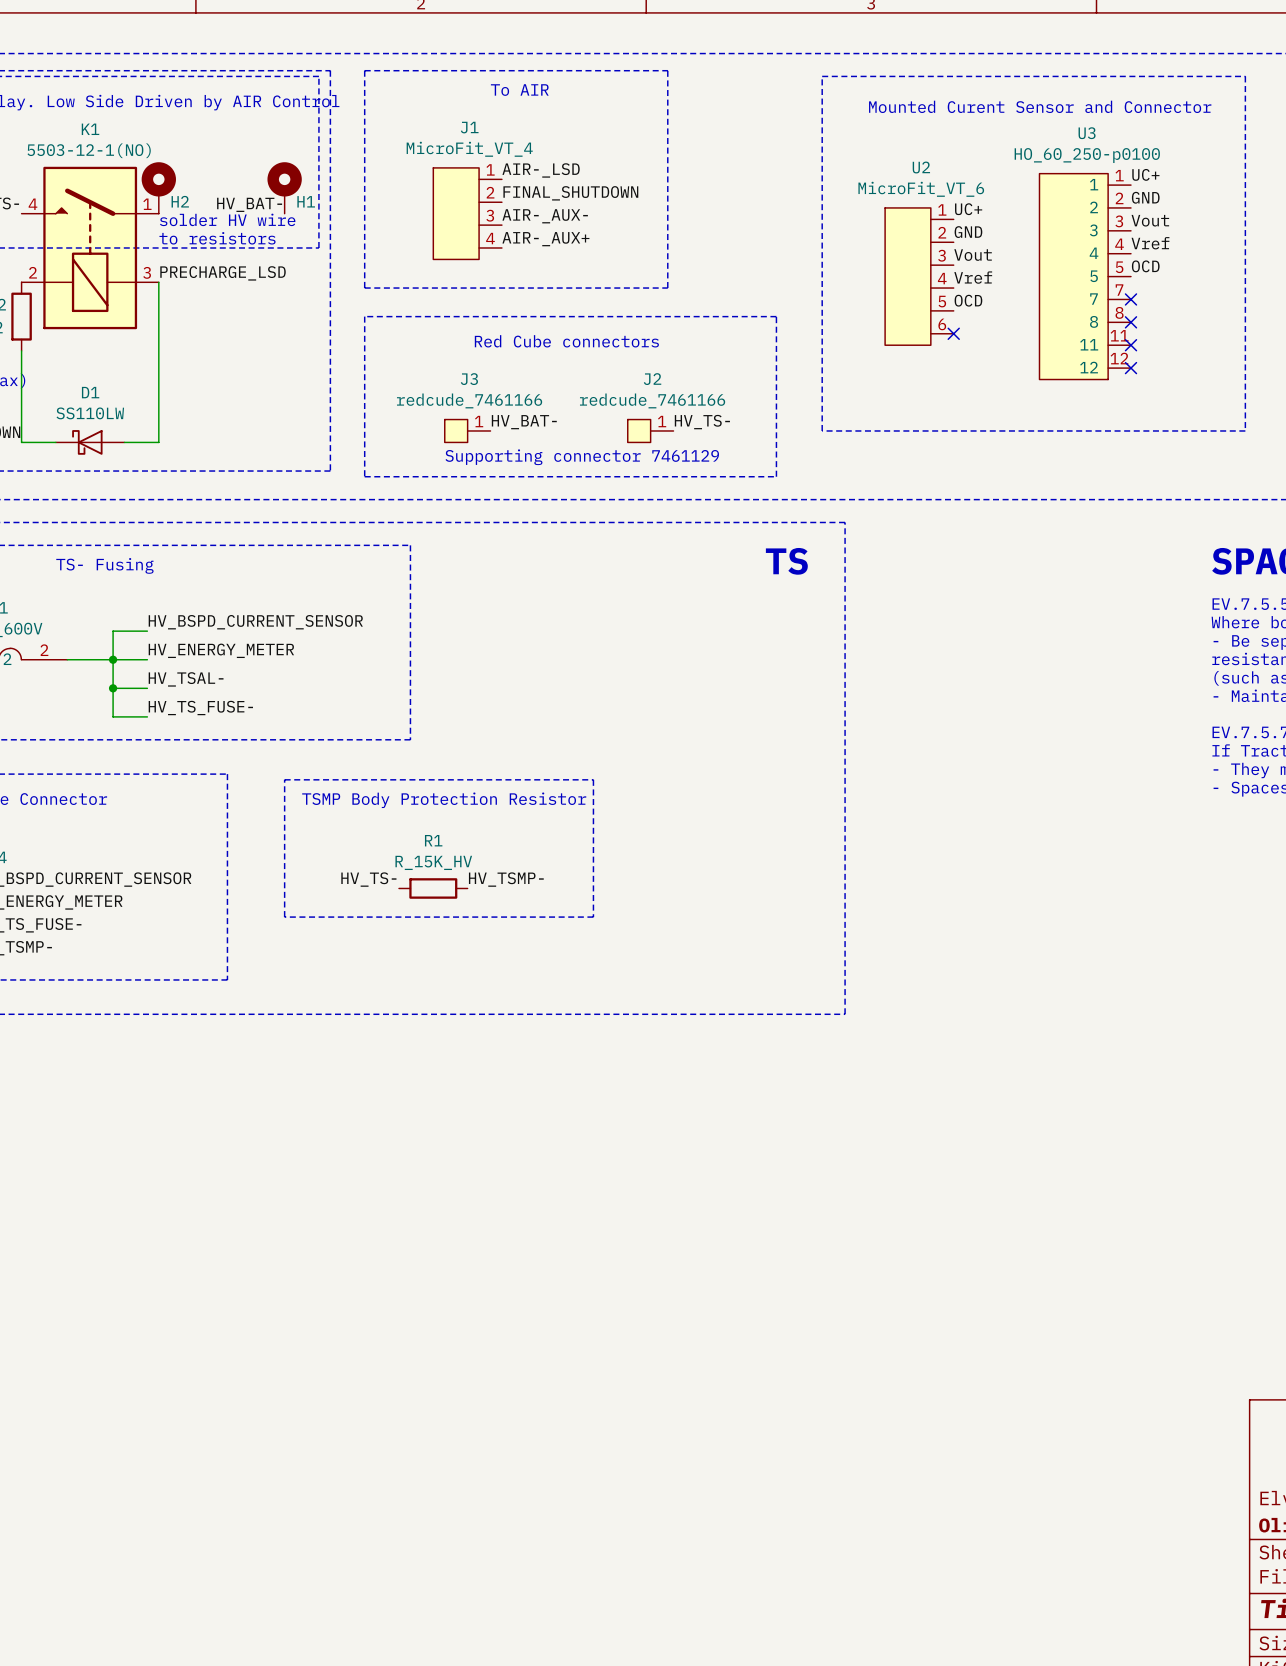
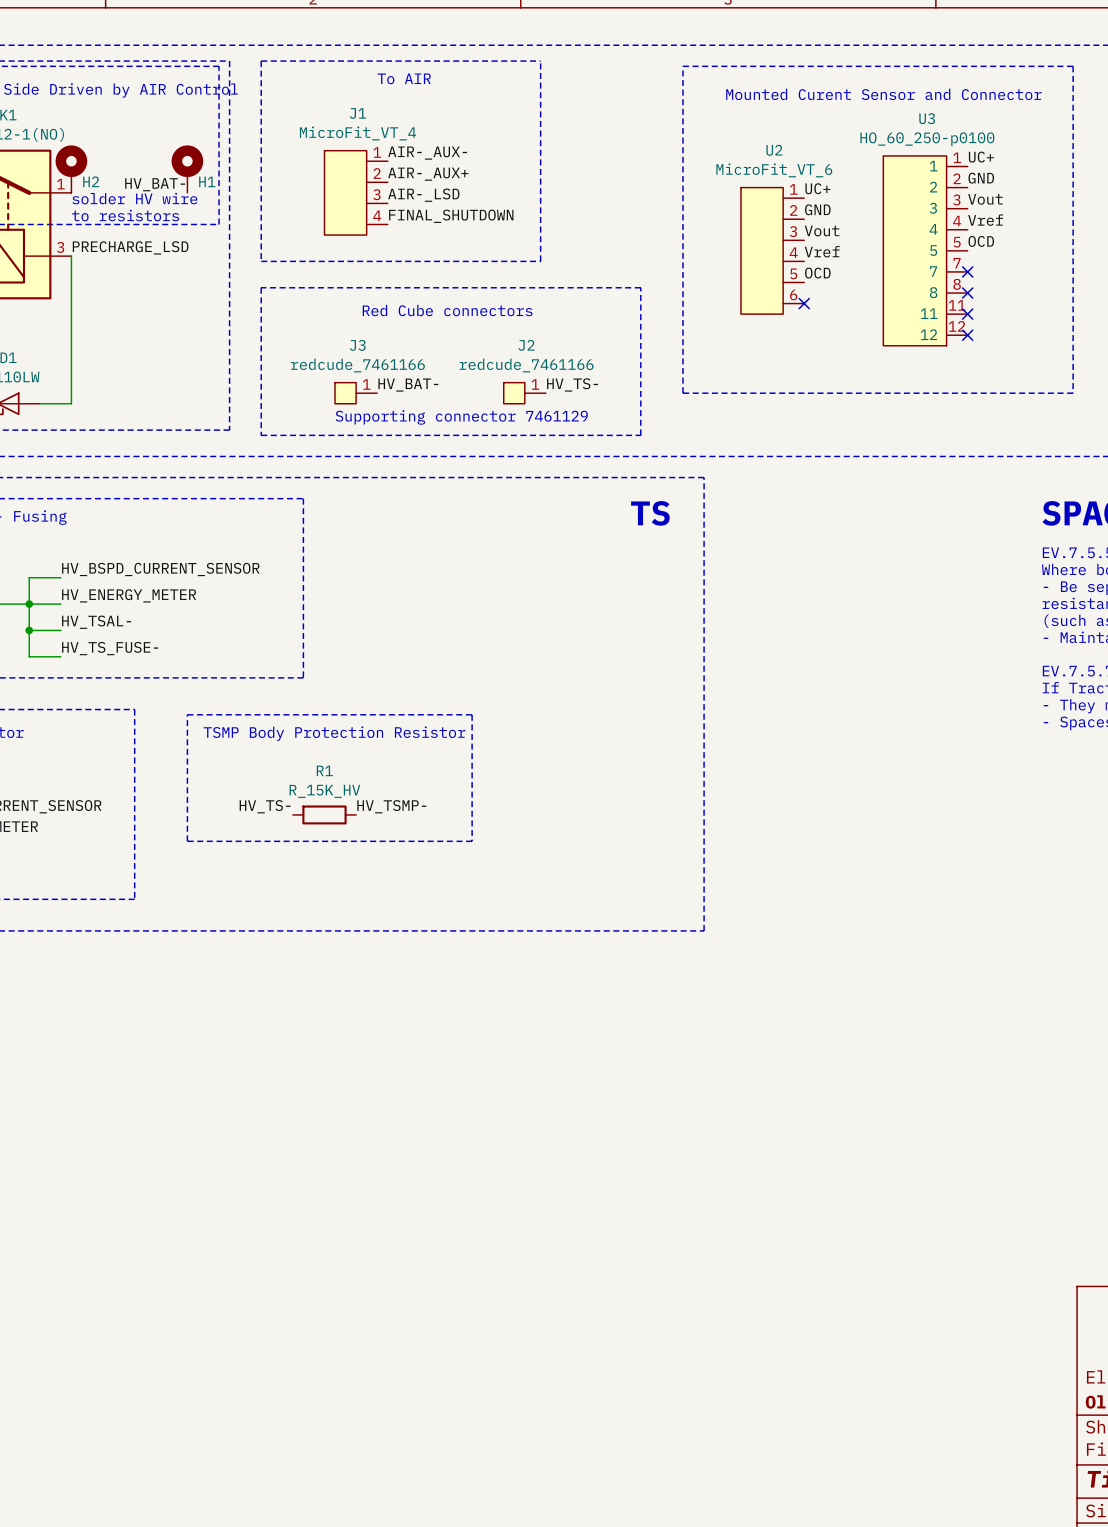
label: AIR-_LSD (541, 170) -> AIR-_AUX- (427, 153)
label: FINAL_SHUTDOWN (570, 193) -> AIR-_AUX+ (428, 174)
label: AIR-_AUX- (545, 216) -> AIR-_LSD (423, 195)
label: AIR-_AUX+ (545, 239) -> FINAL_SHUTDOWN (451, 216)

